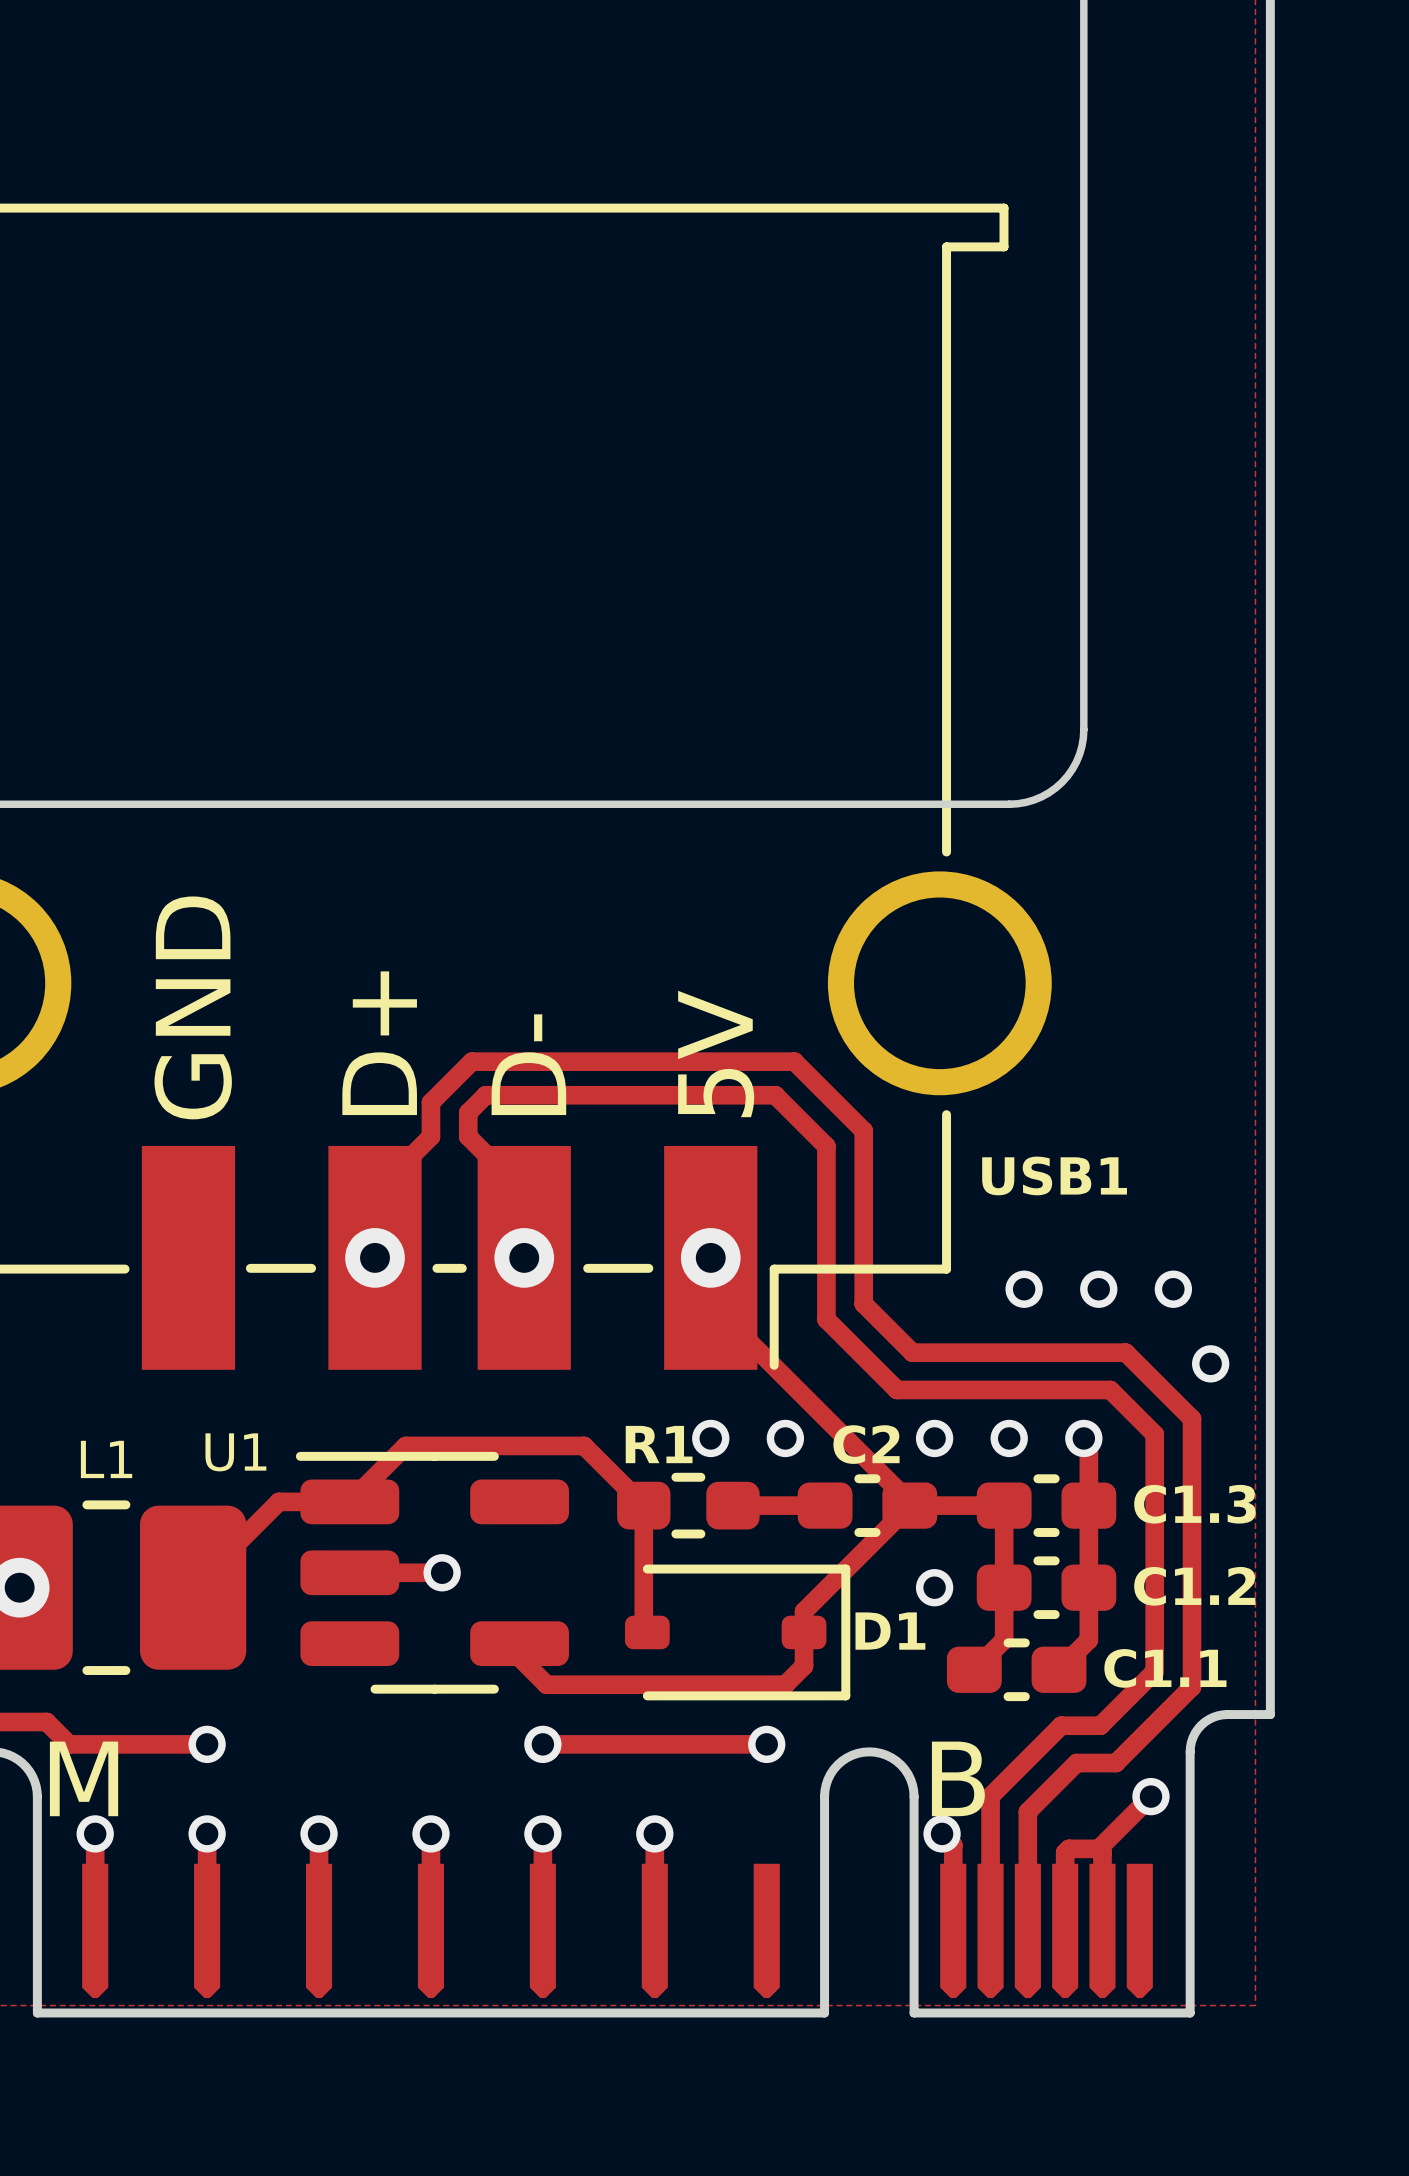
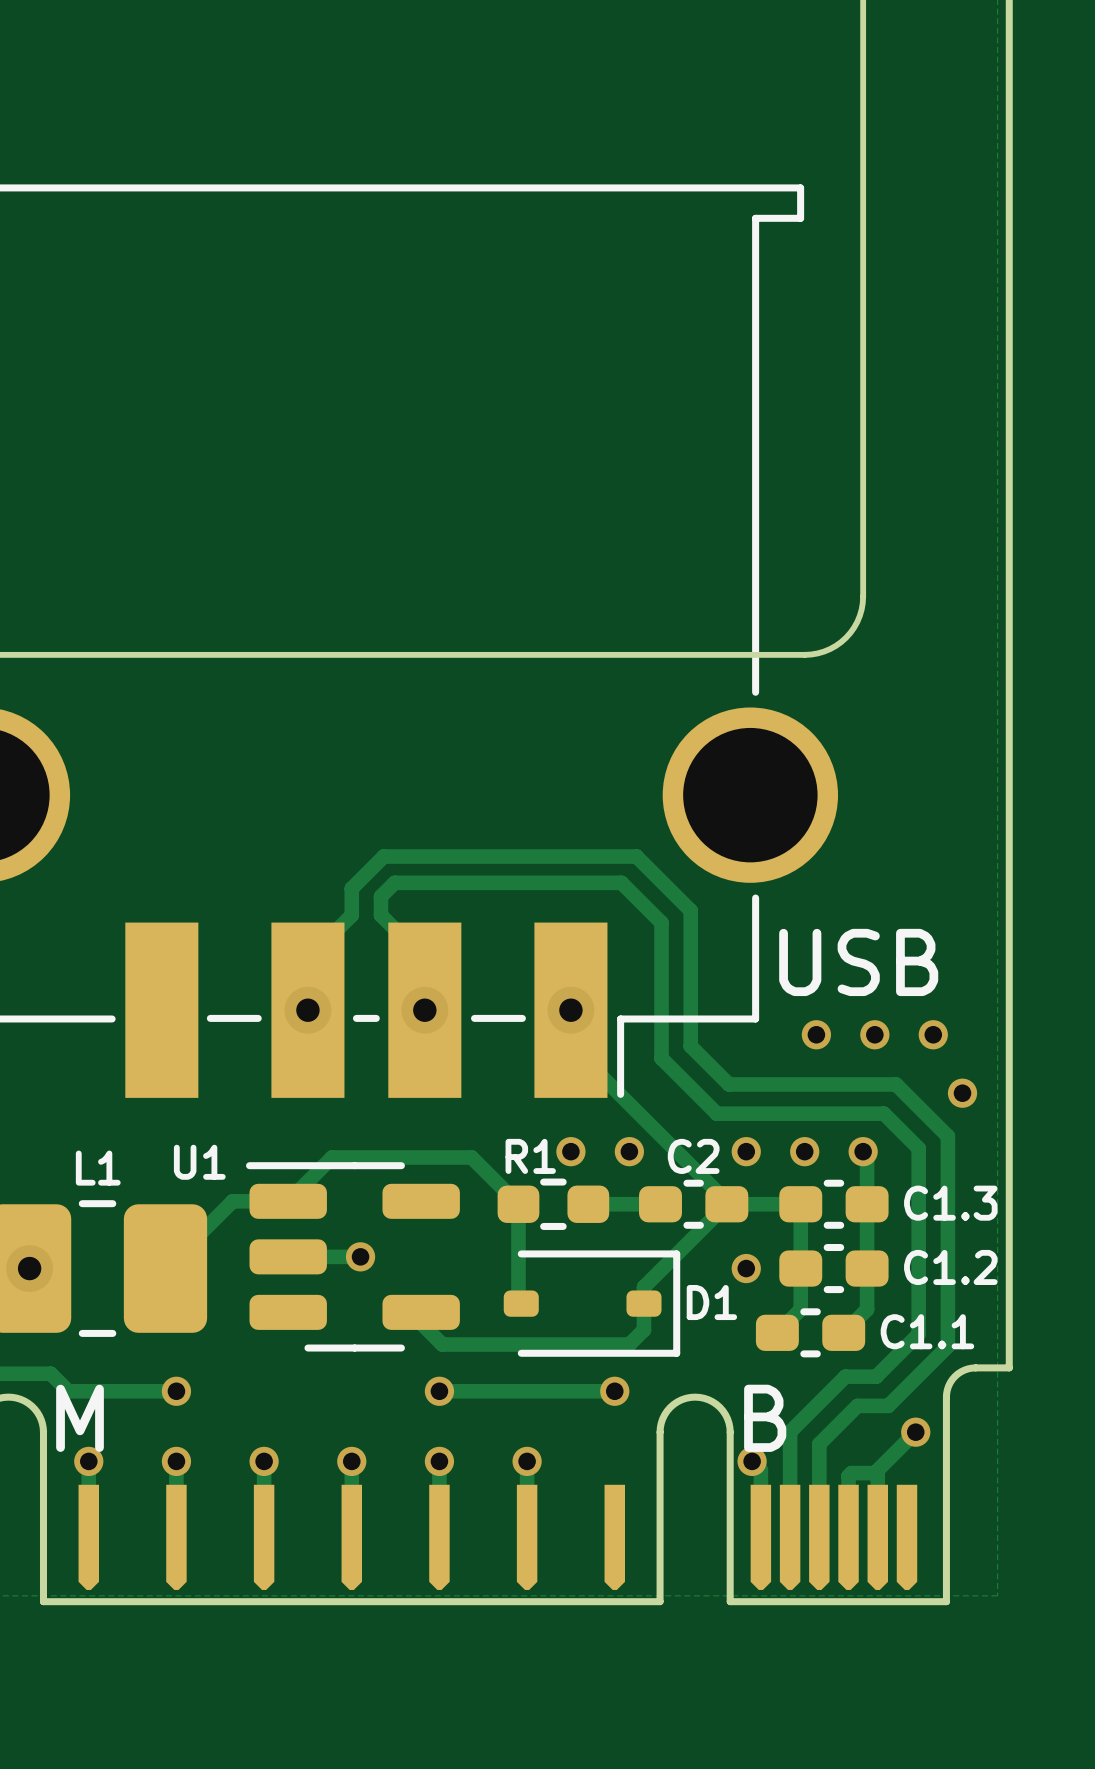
text: GND (193, 1007) -> none
text: D+ (379, 1043) -> none
text: 5V (716, 1054) -> none
text: D- (528, 1064) -> none
USB1 name: USB1 (1054, 1175) -> none
USB1 text: none -> USB (858, 962)

